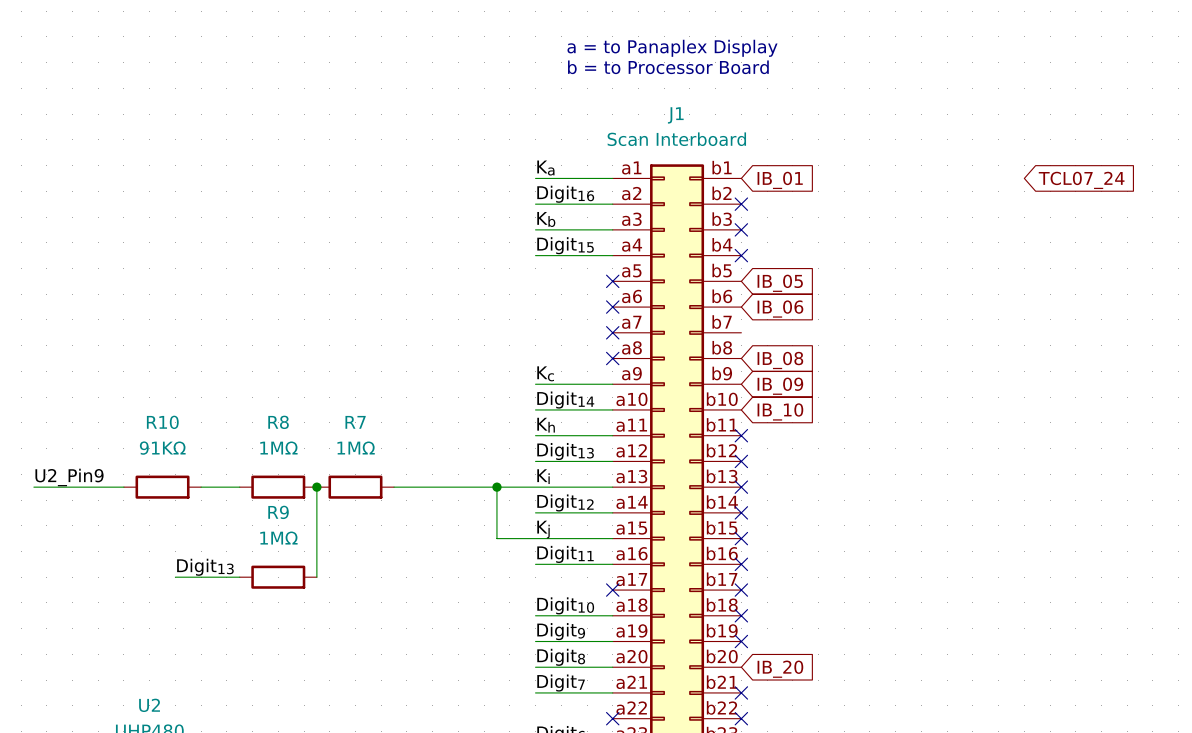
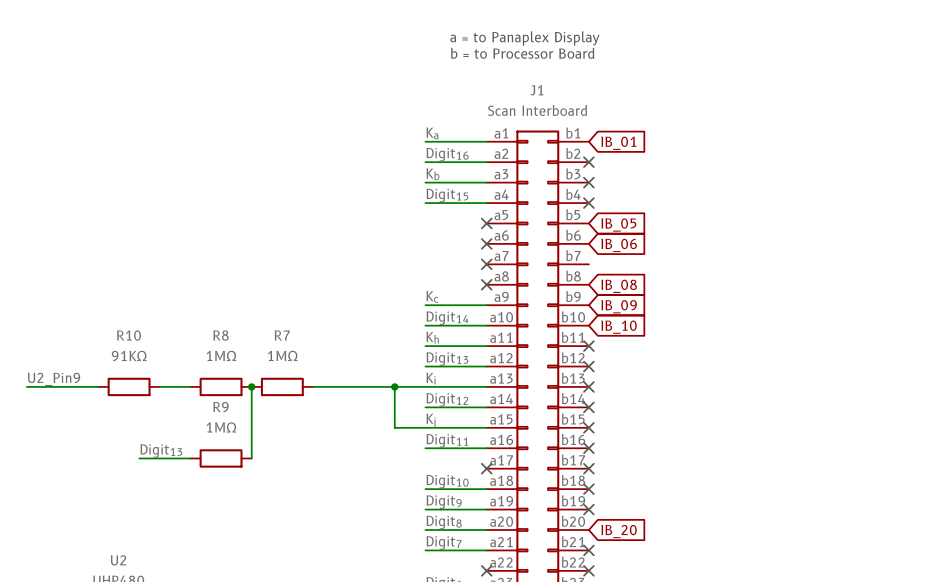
global label: TCL07_24 (1081, 180) -> none

